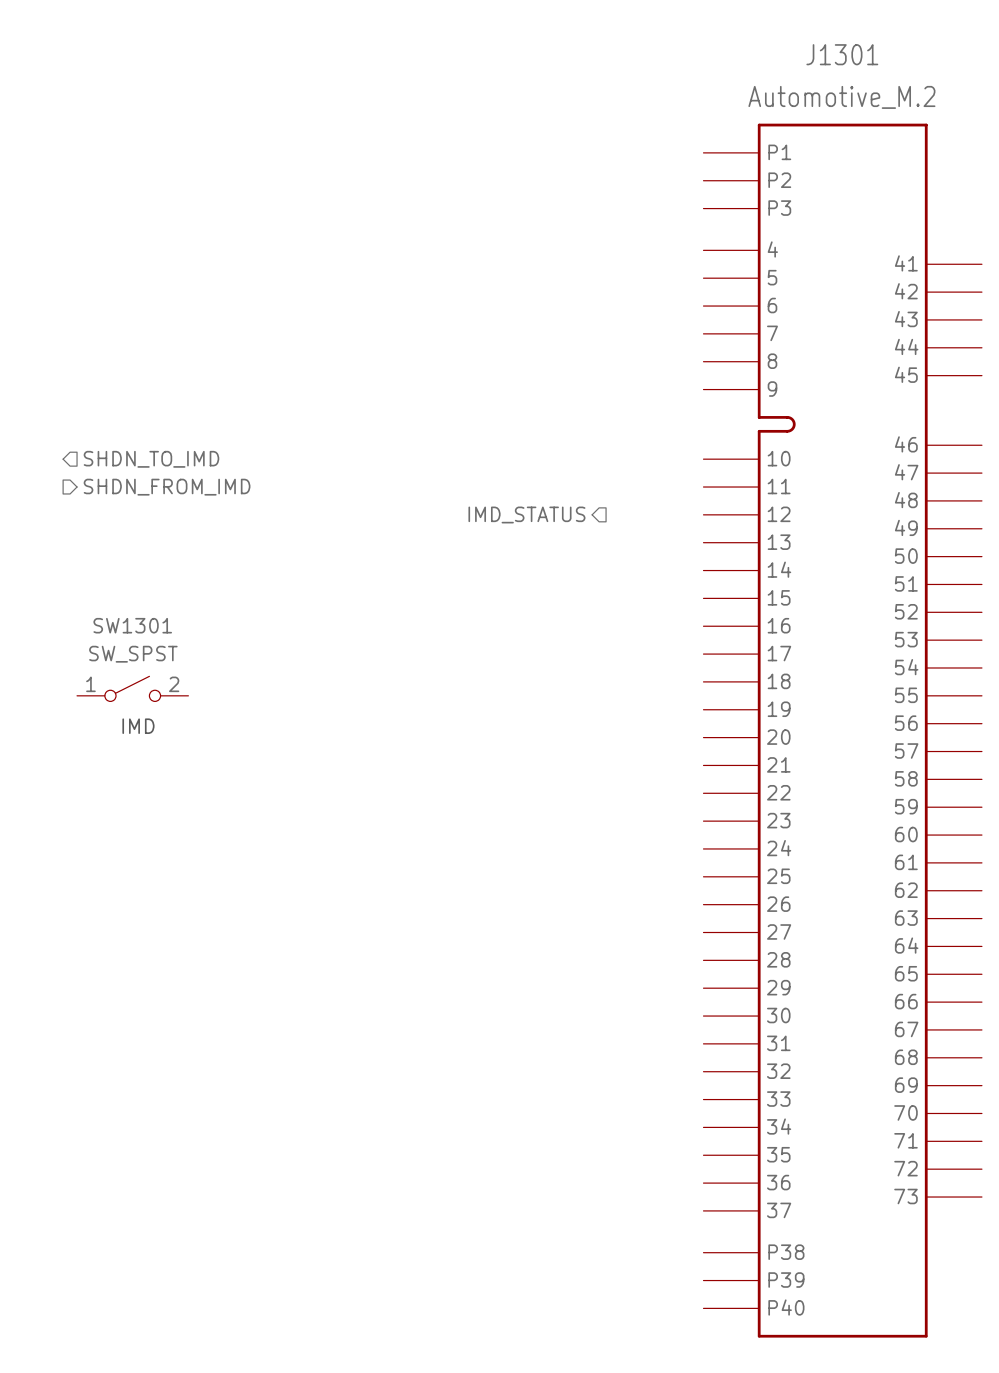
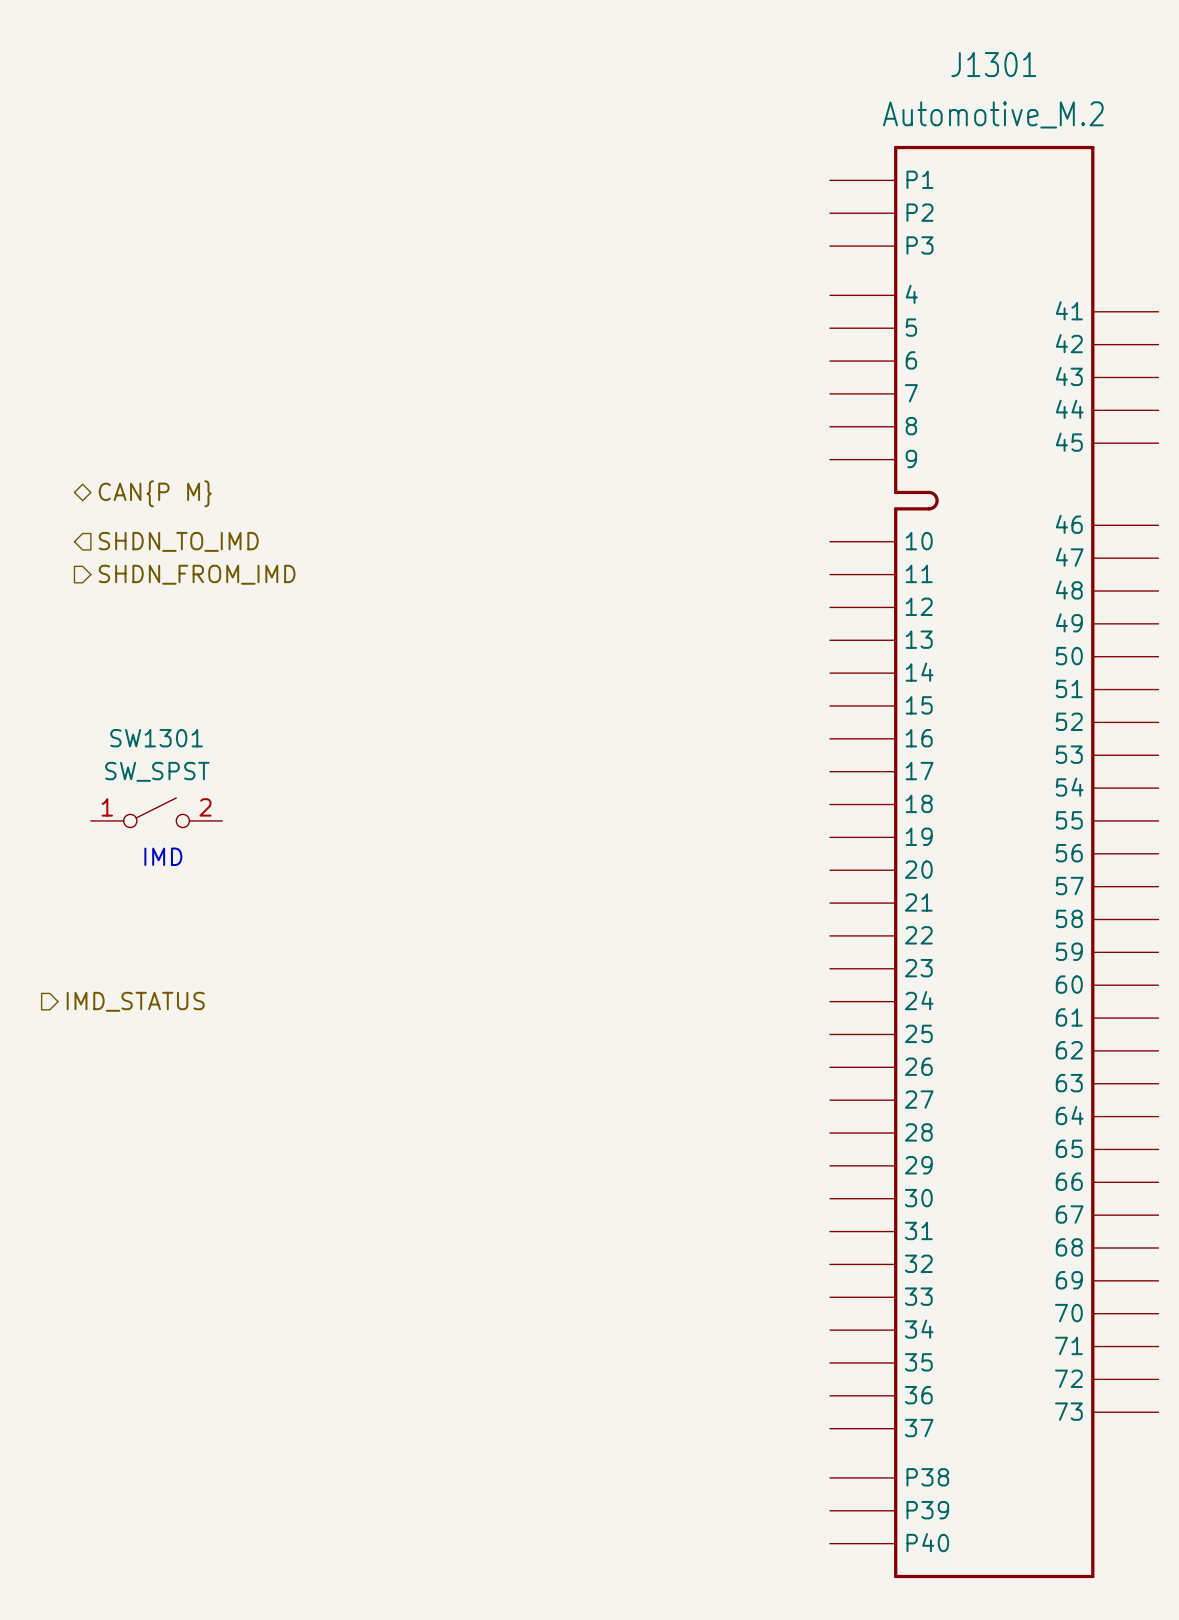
hierarchical label: none -> CAN{P M} (155, 493)
hierarchical label: IMD_STATUS (526, 514) -> none
hierarchical label: none -> IMD_STATUS (135, 1001)

